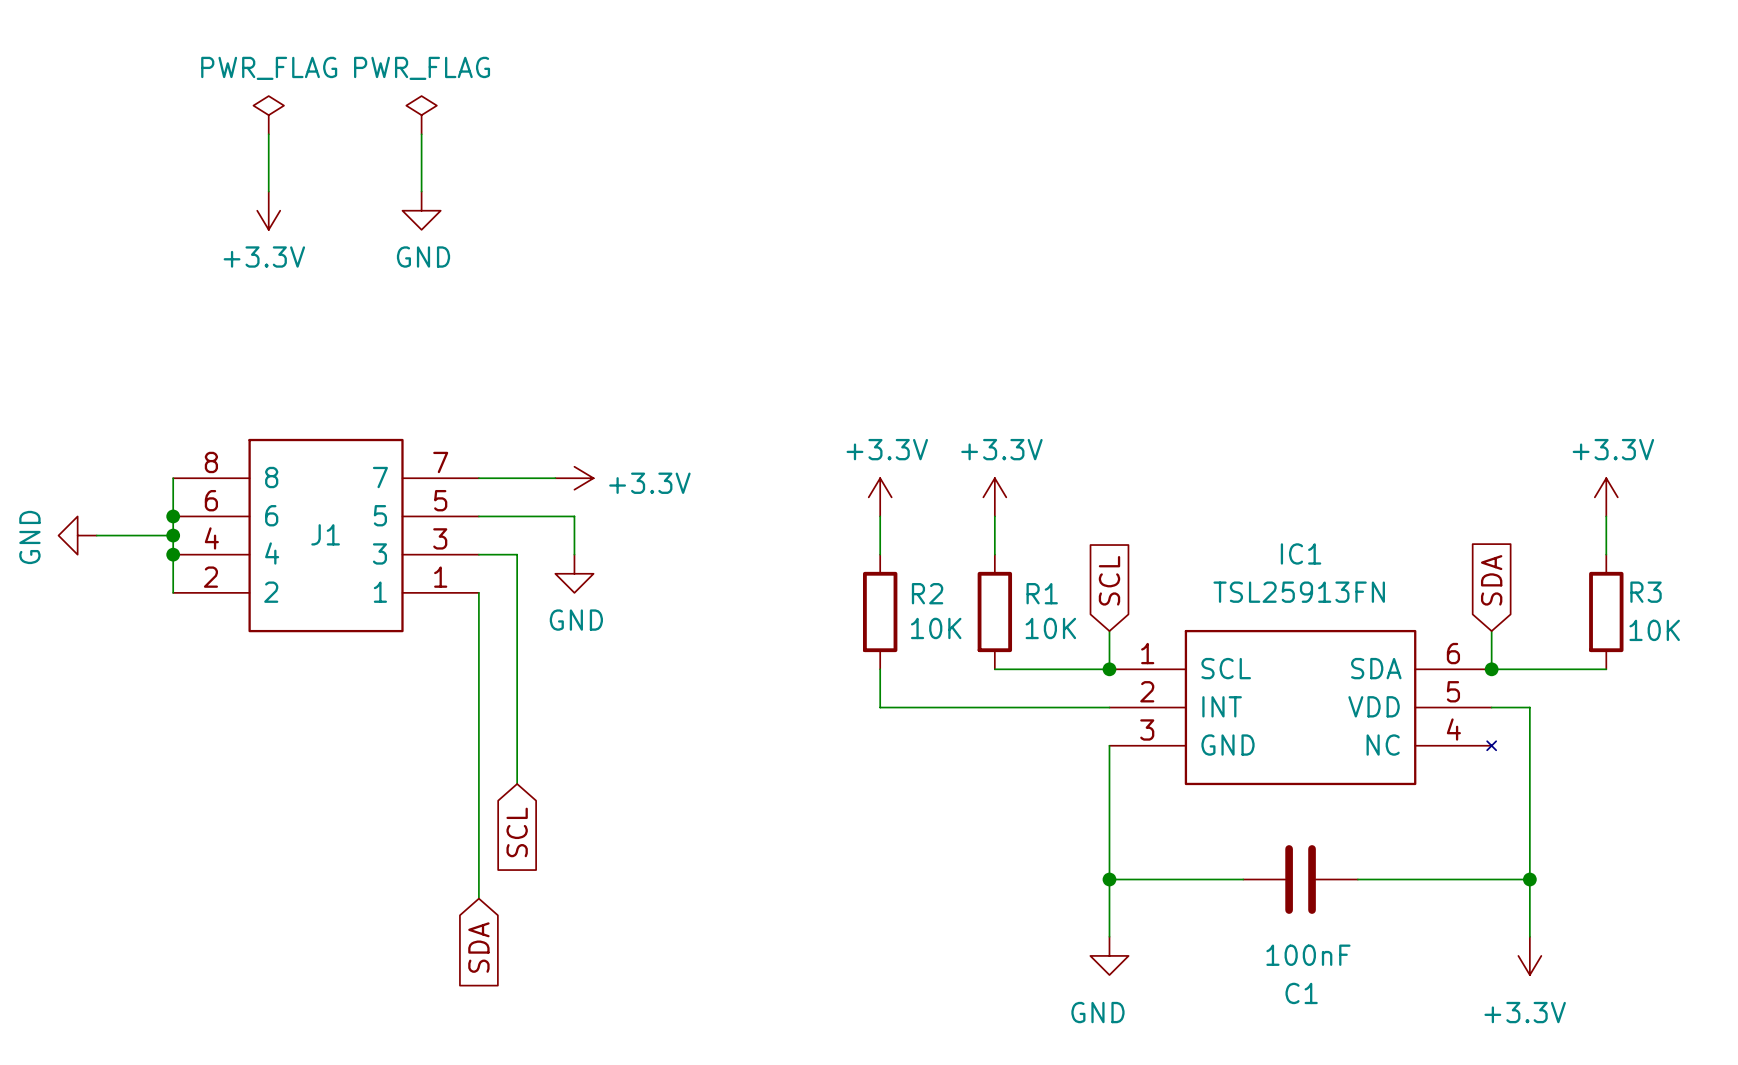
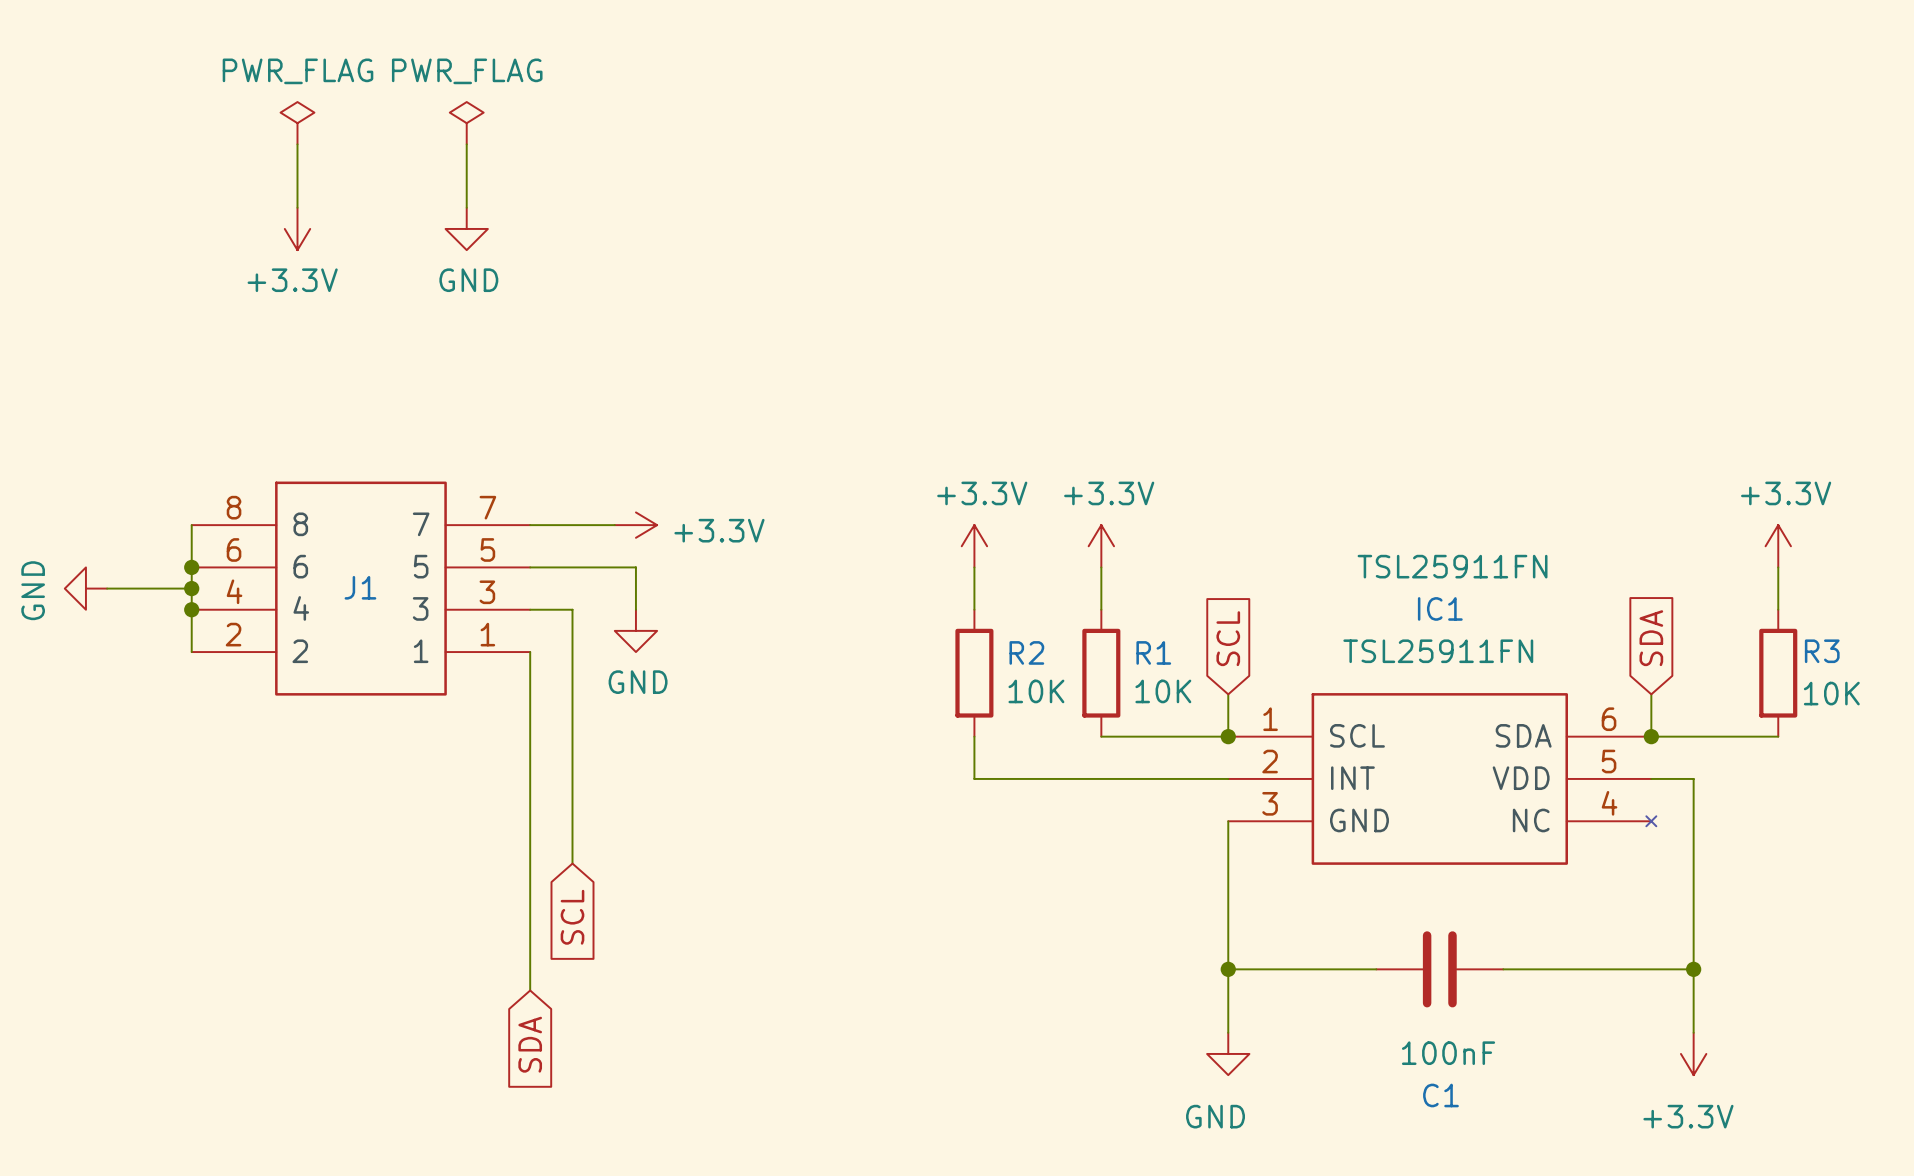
IC1 text: none -> TSL25911FN (1452, 566)
IC1 value: TSL25913FN (1299, 592) -> TSL25911FN (1438, 651)

